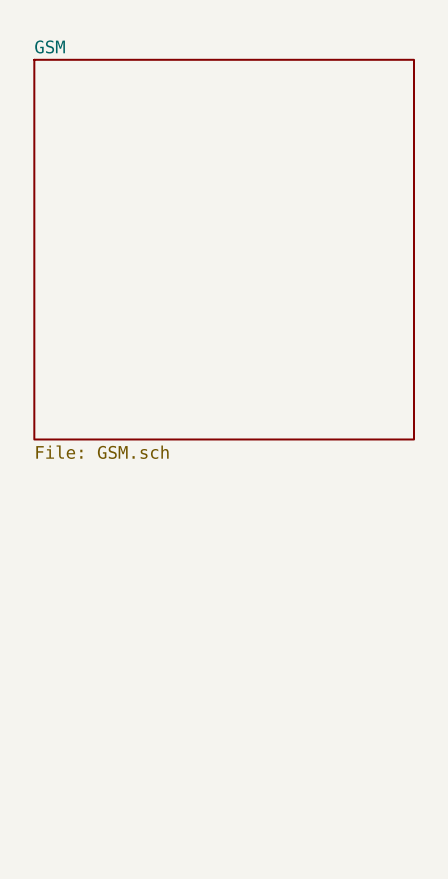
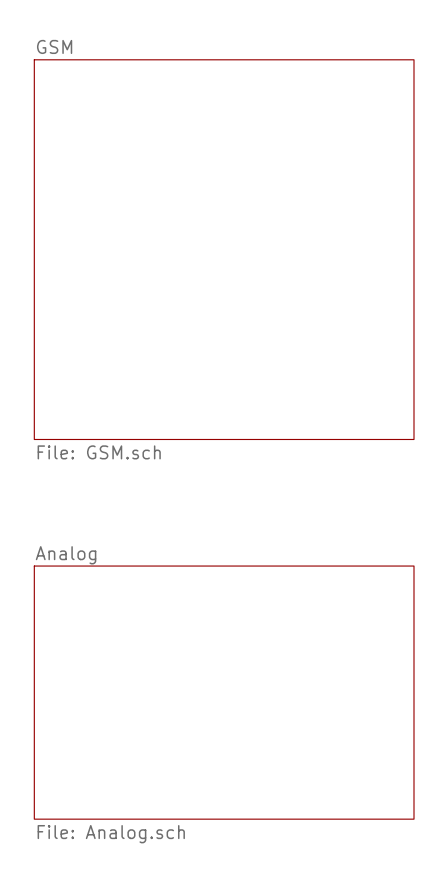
sheet Analog: none -> File: Analog.sch (224, 692)

